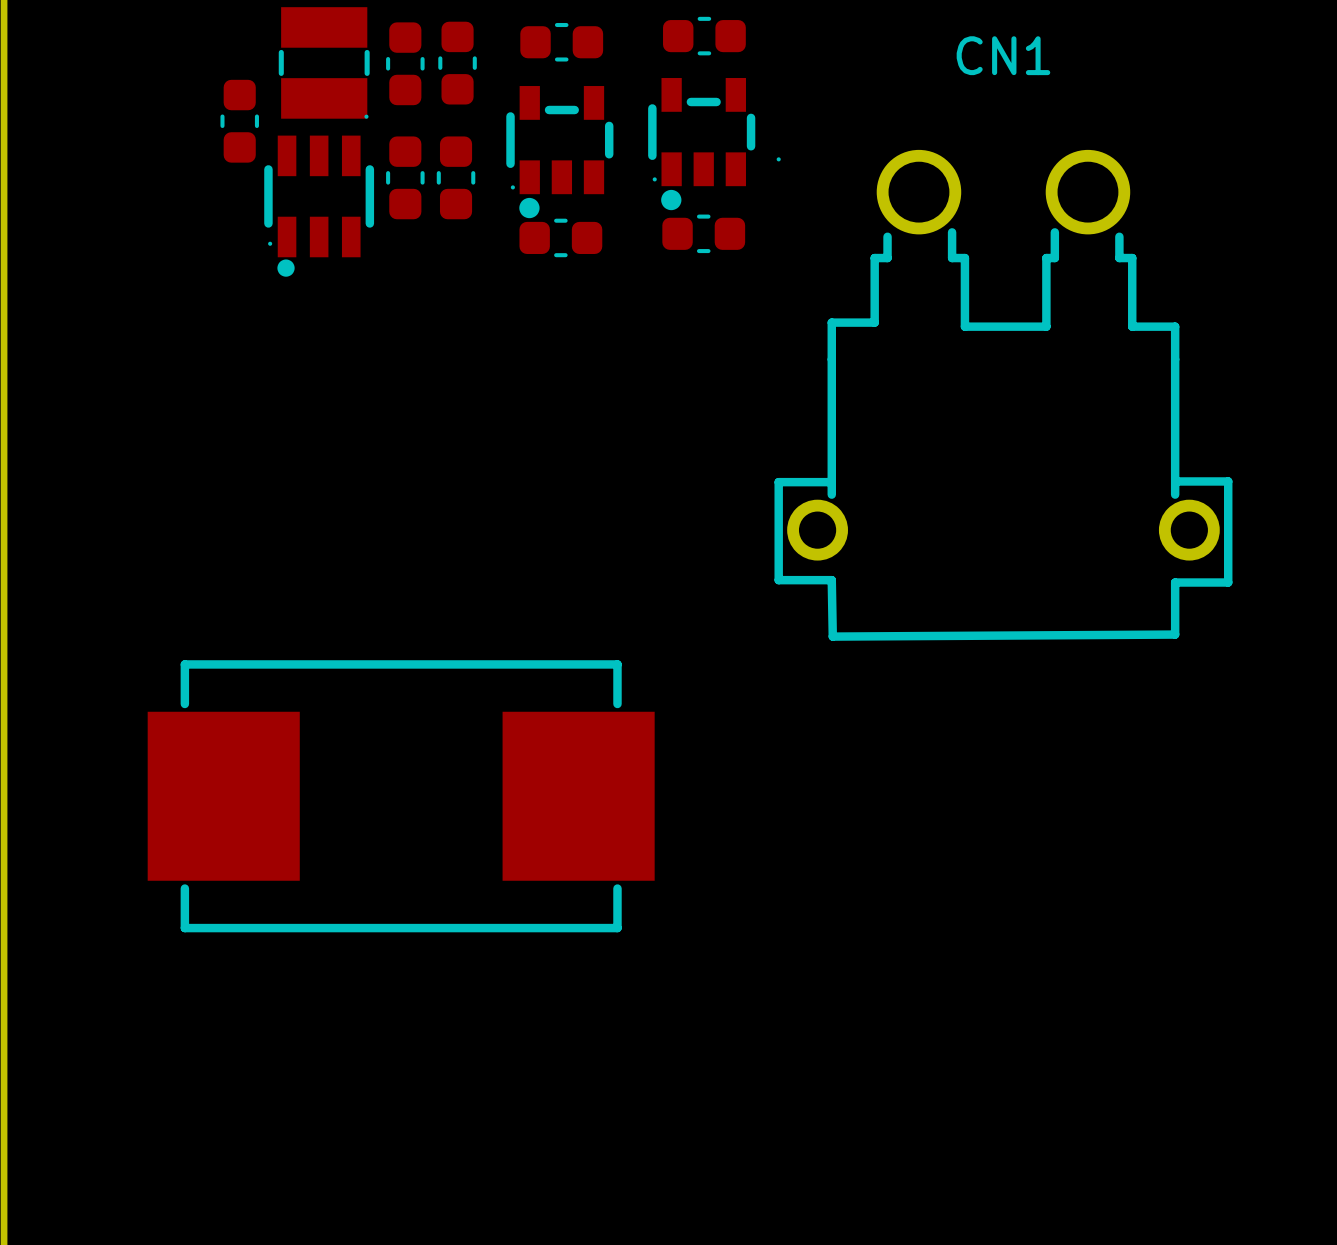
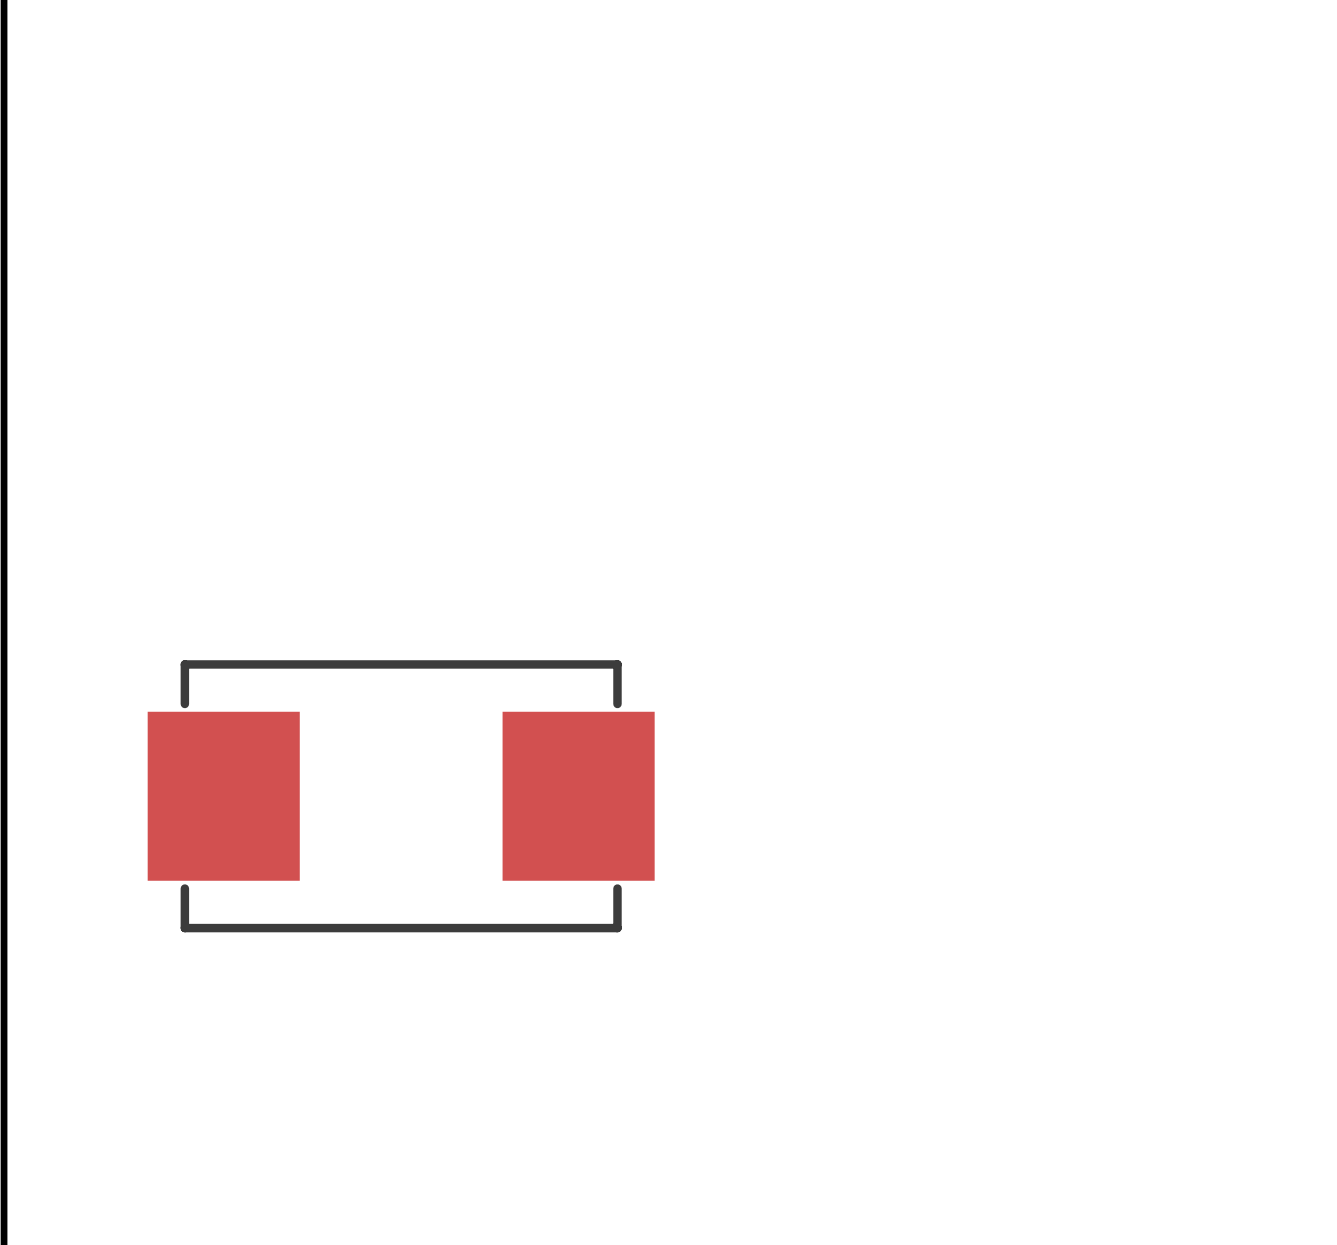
part: (704, 36) -> none
part: (561, 42) -> none
part: (324, 62) -> none
part: (405, 63) -> none
part: (457, 63) -> none
part: (239, 121) -> none
part: (701, 144) -> none
part: (559, 152) -> none
part: (405, 177) -> none
part: (456, 177) -> none
part: (319, 206) -> none
part: (703, 233) -> none
part: (560, 237) -> none
CN1: (1003, 395) -> none

